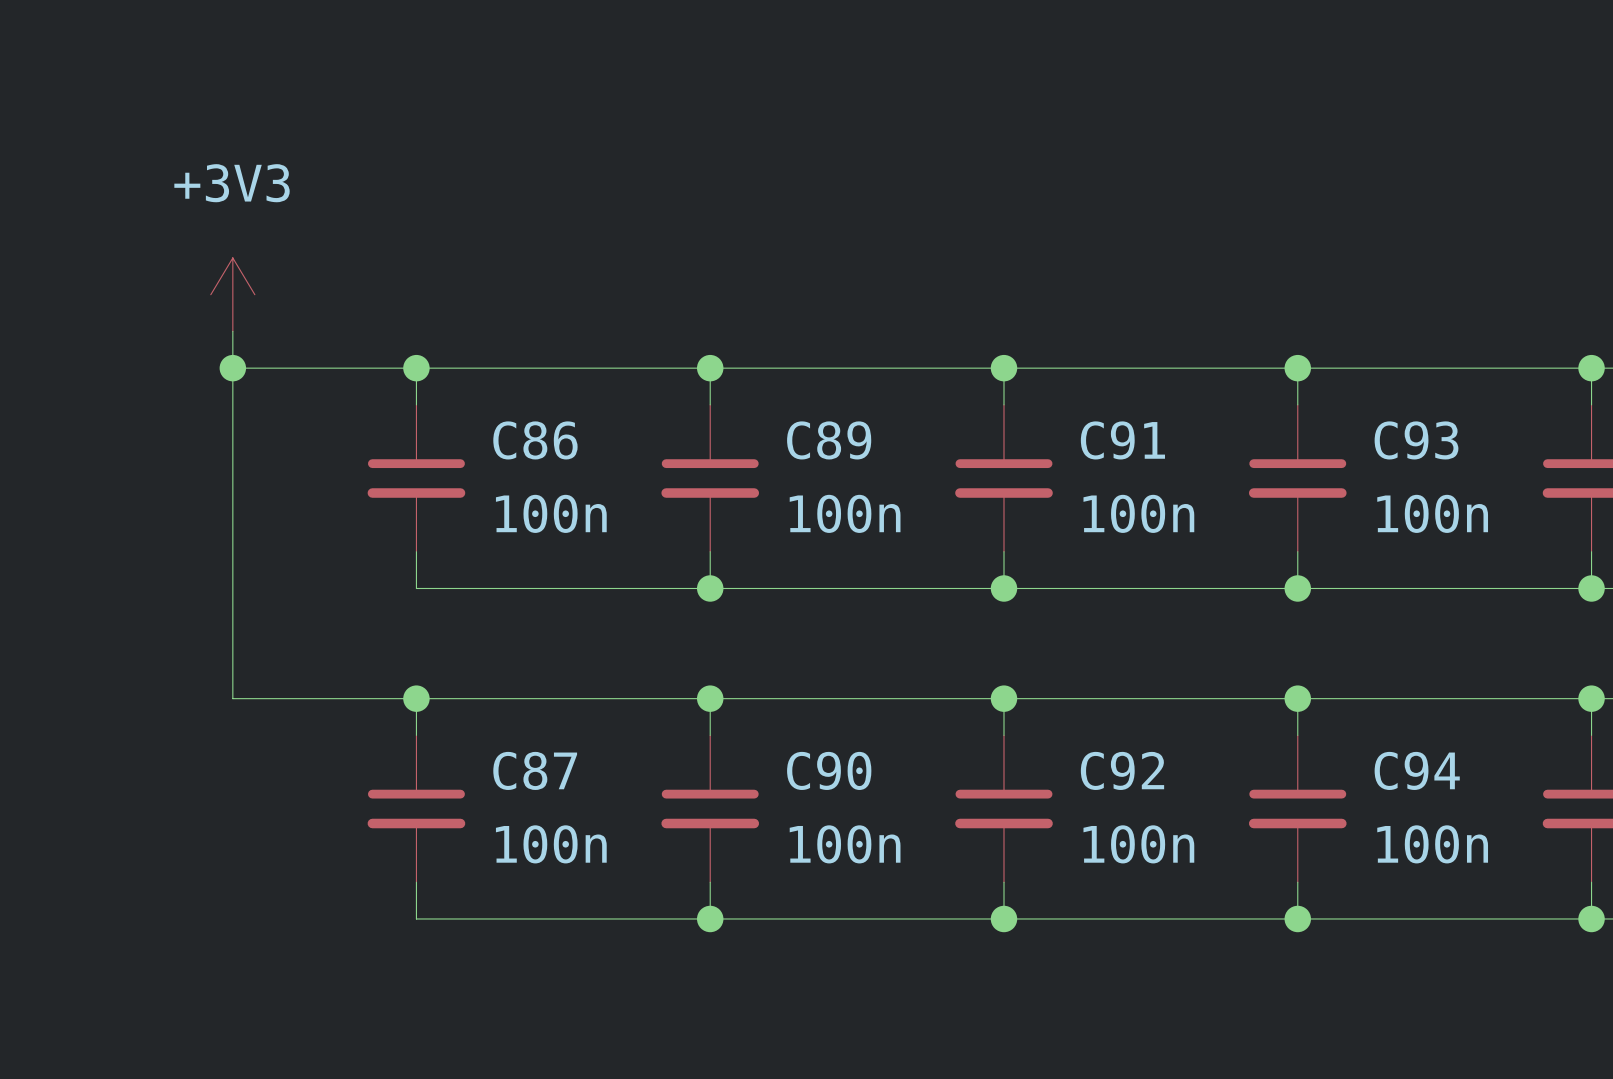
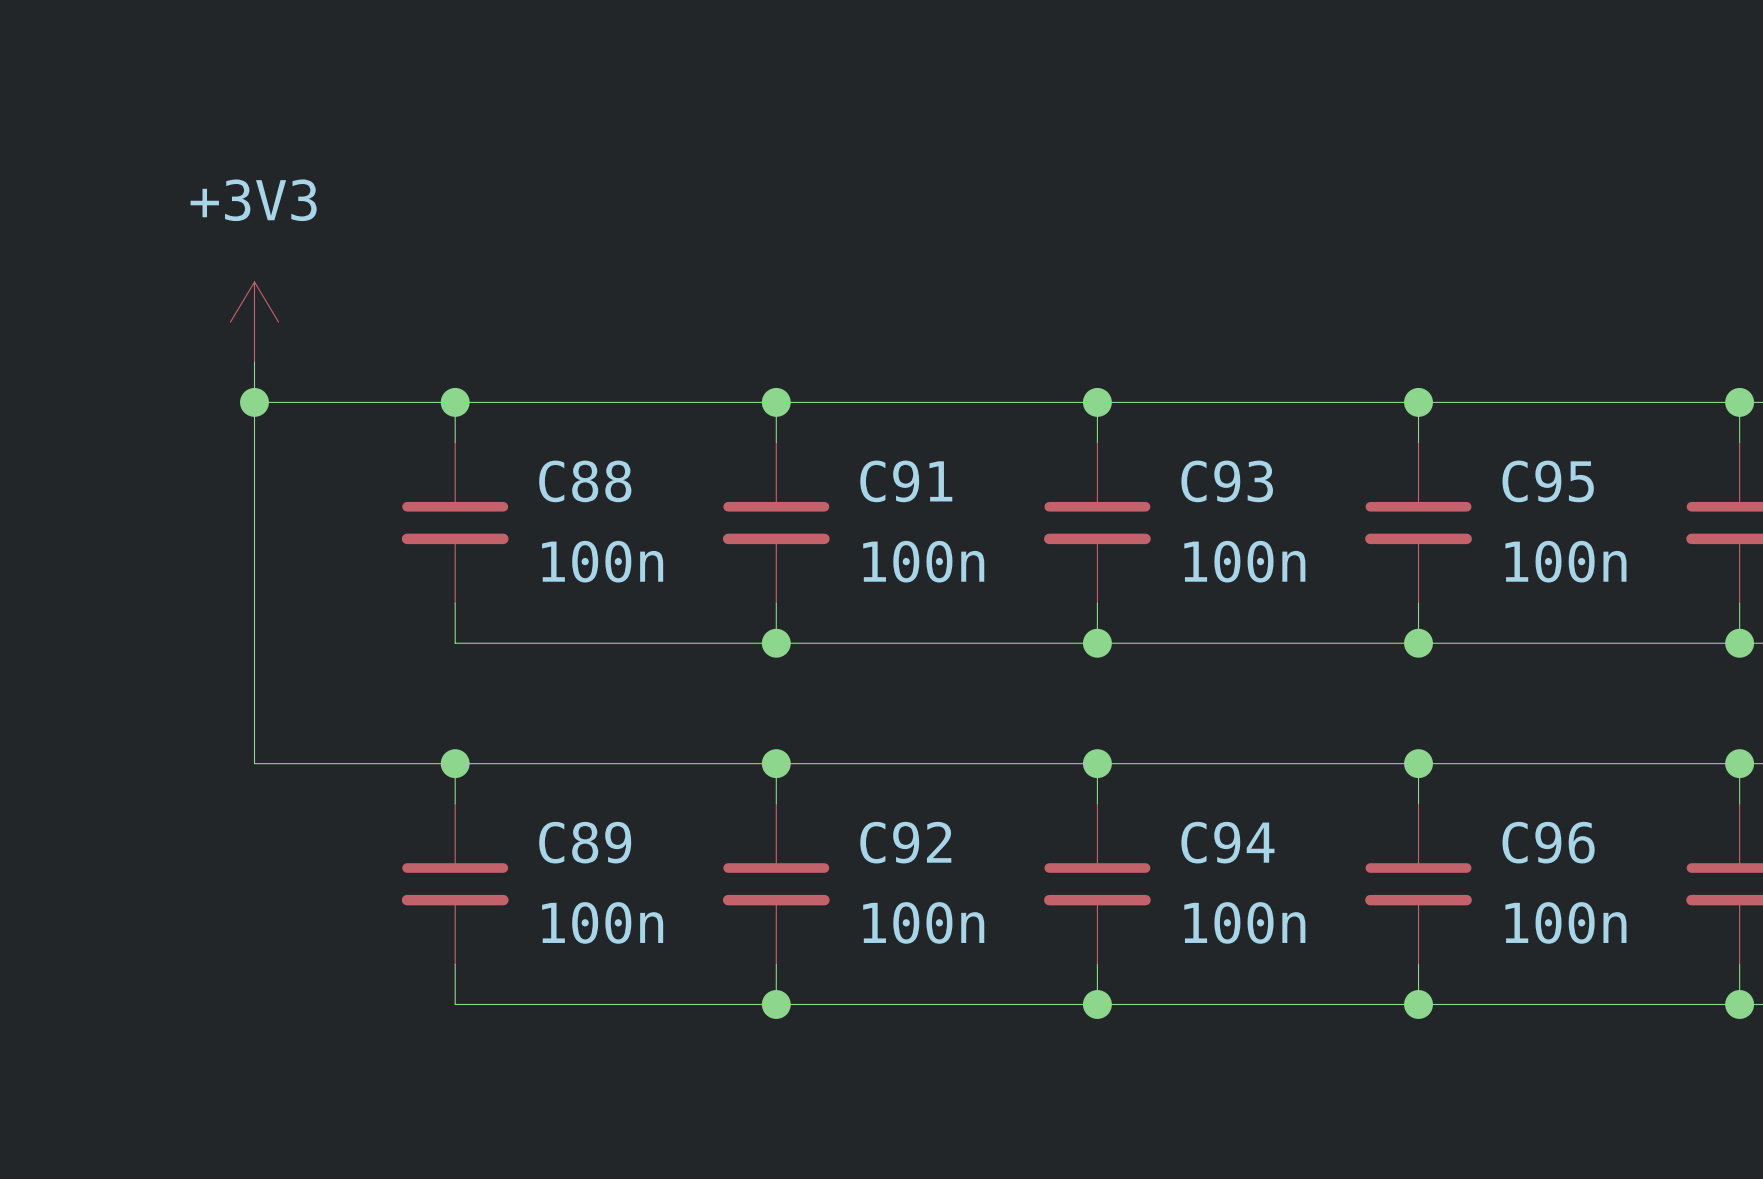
C86 name: C86 (535, 440) -> C88 (585, 481)
C89 name: C89 (829, 440) -> C91 (906, 481)
C91 name: C91 (1122, 440) -> C93 (1227, 481)
C93 name: C93 (1416, 440) -> C95 (1548, 481)
C87 name: C87 (535, 770) -> C89 (585, 842)
C90 name: C90 (829, 770) -> C92 (905, 842)
C92 name: C92 (1122, 770) -> C94 (1227, 842)
C94 name: C94 (1417, 770) -> C96 (1548, 842)

